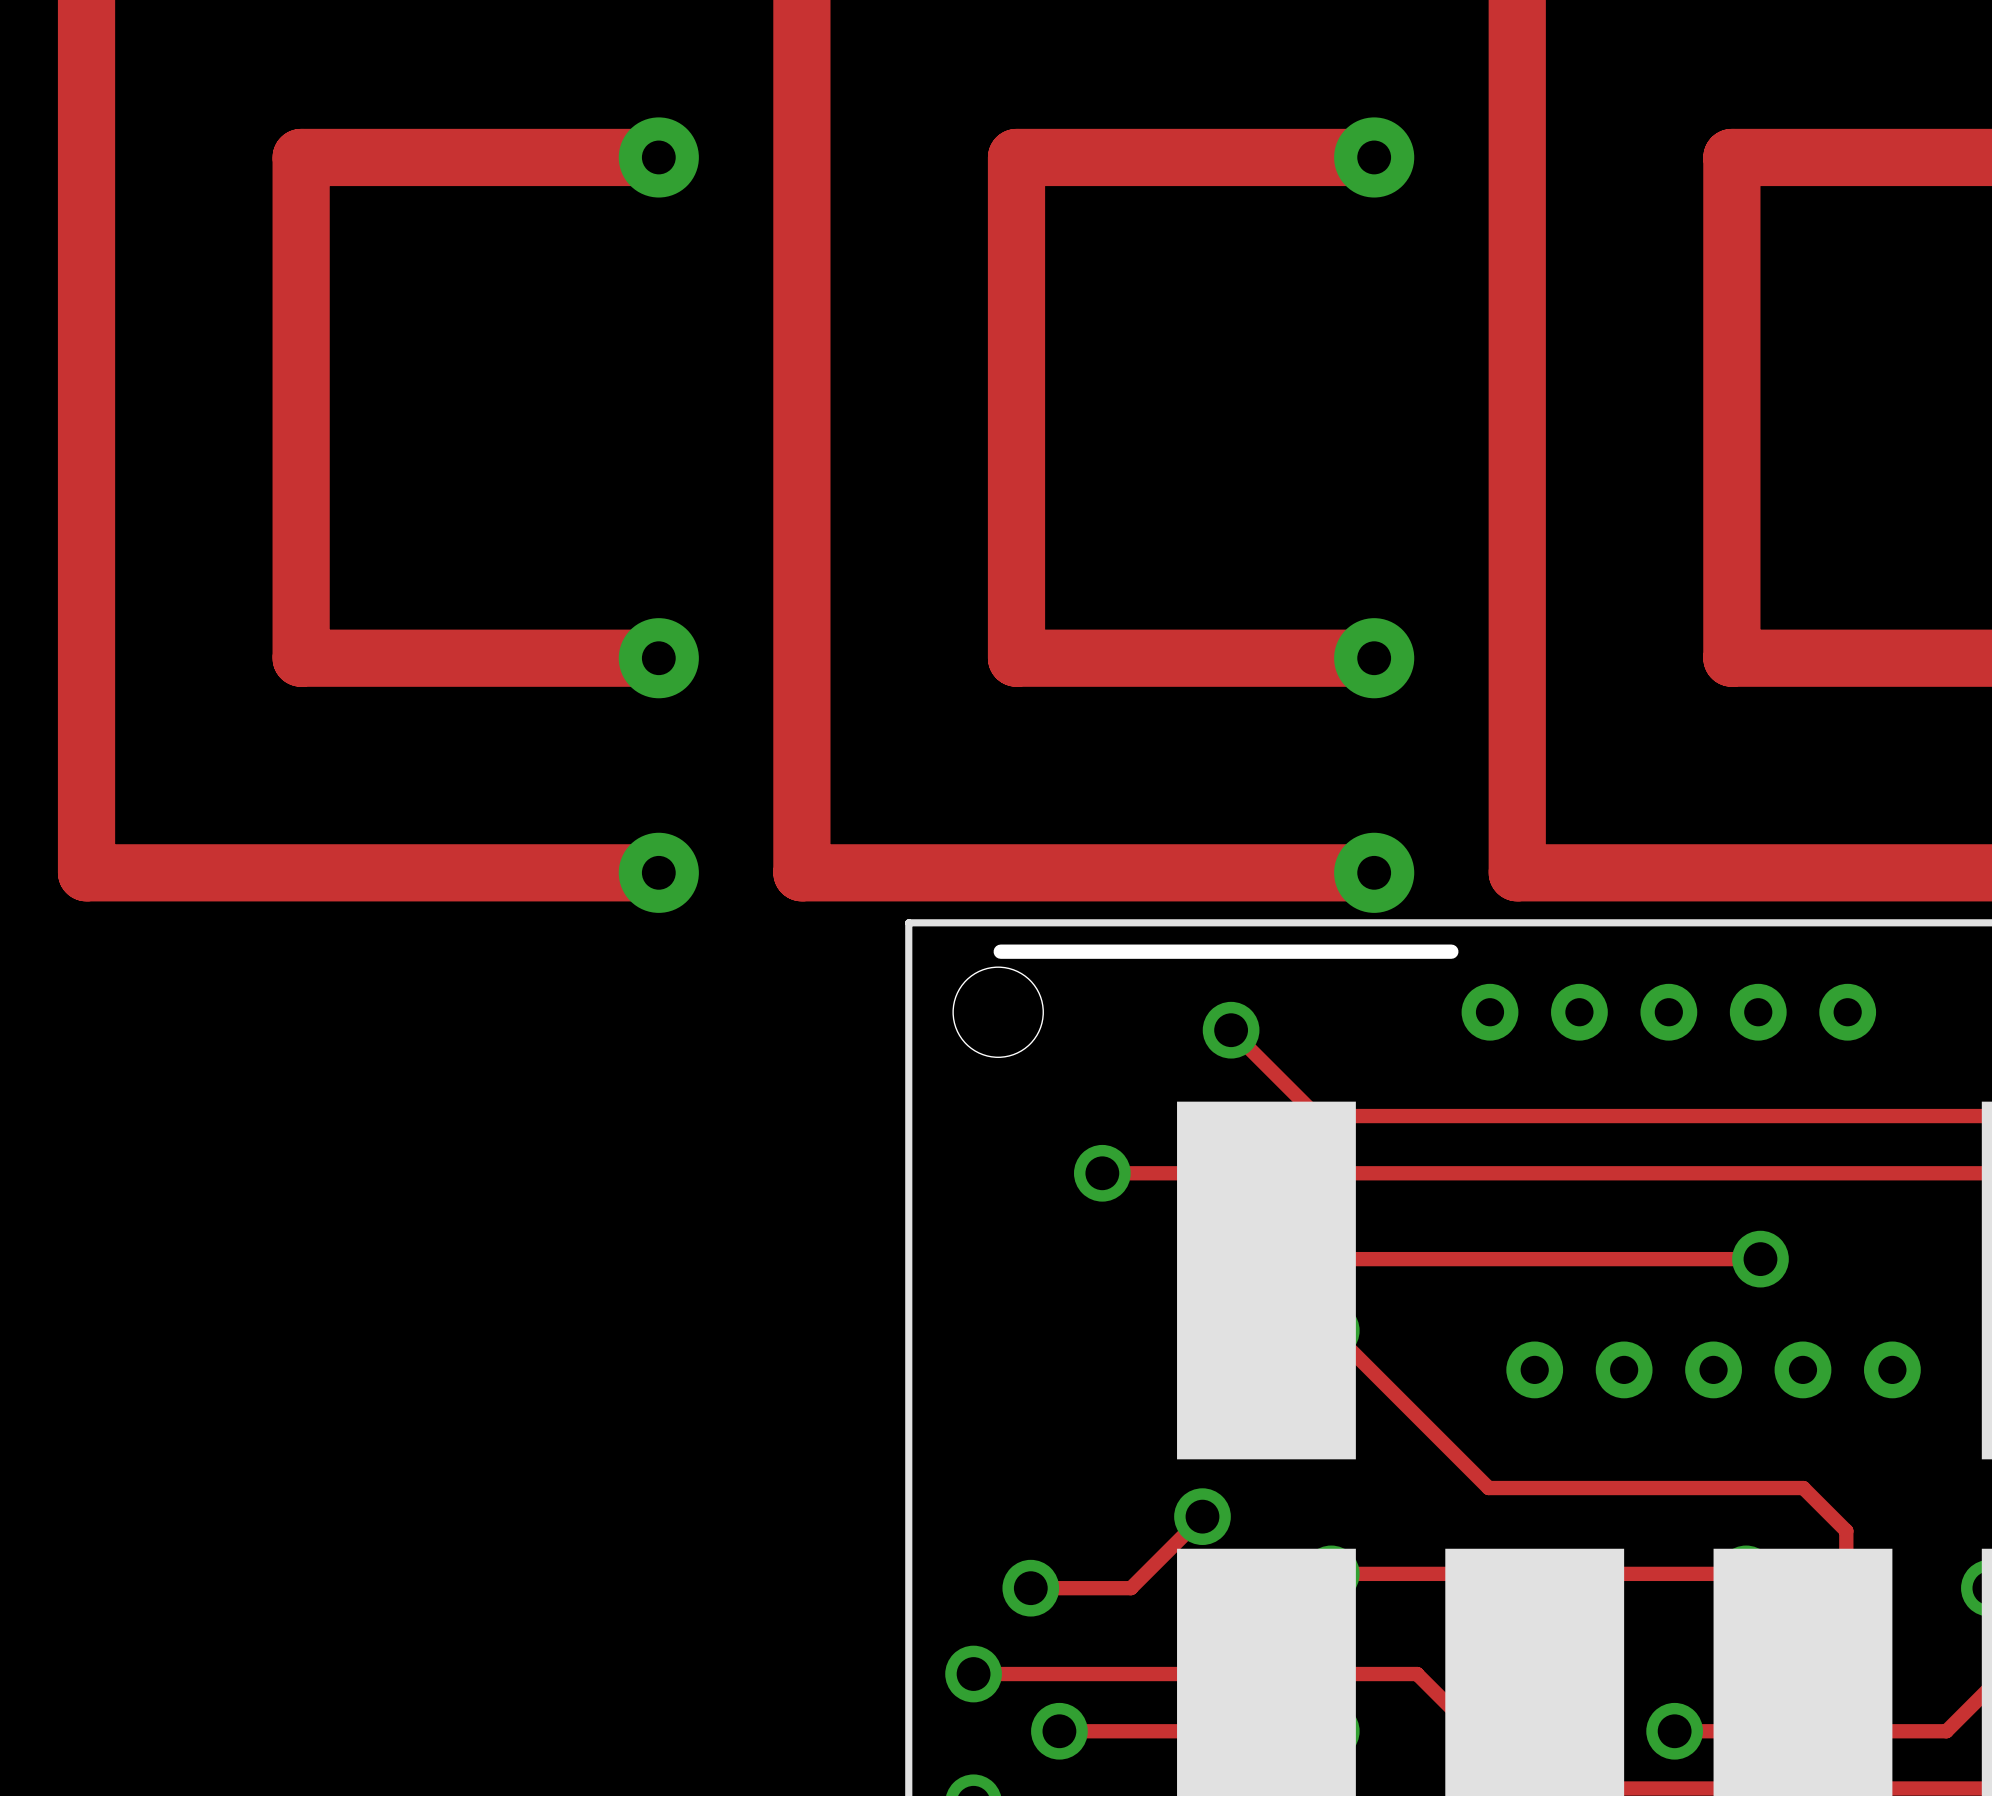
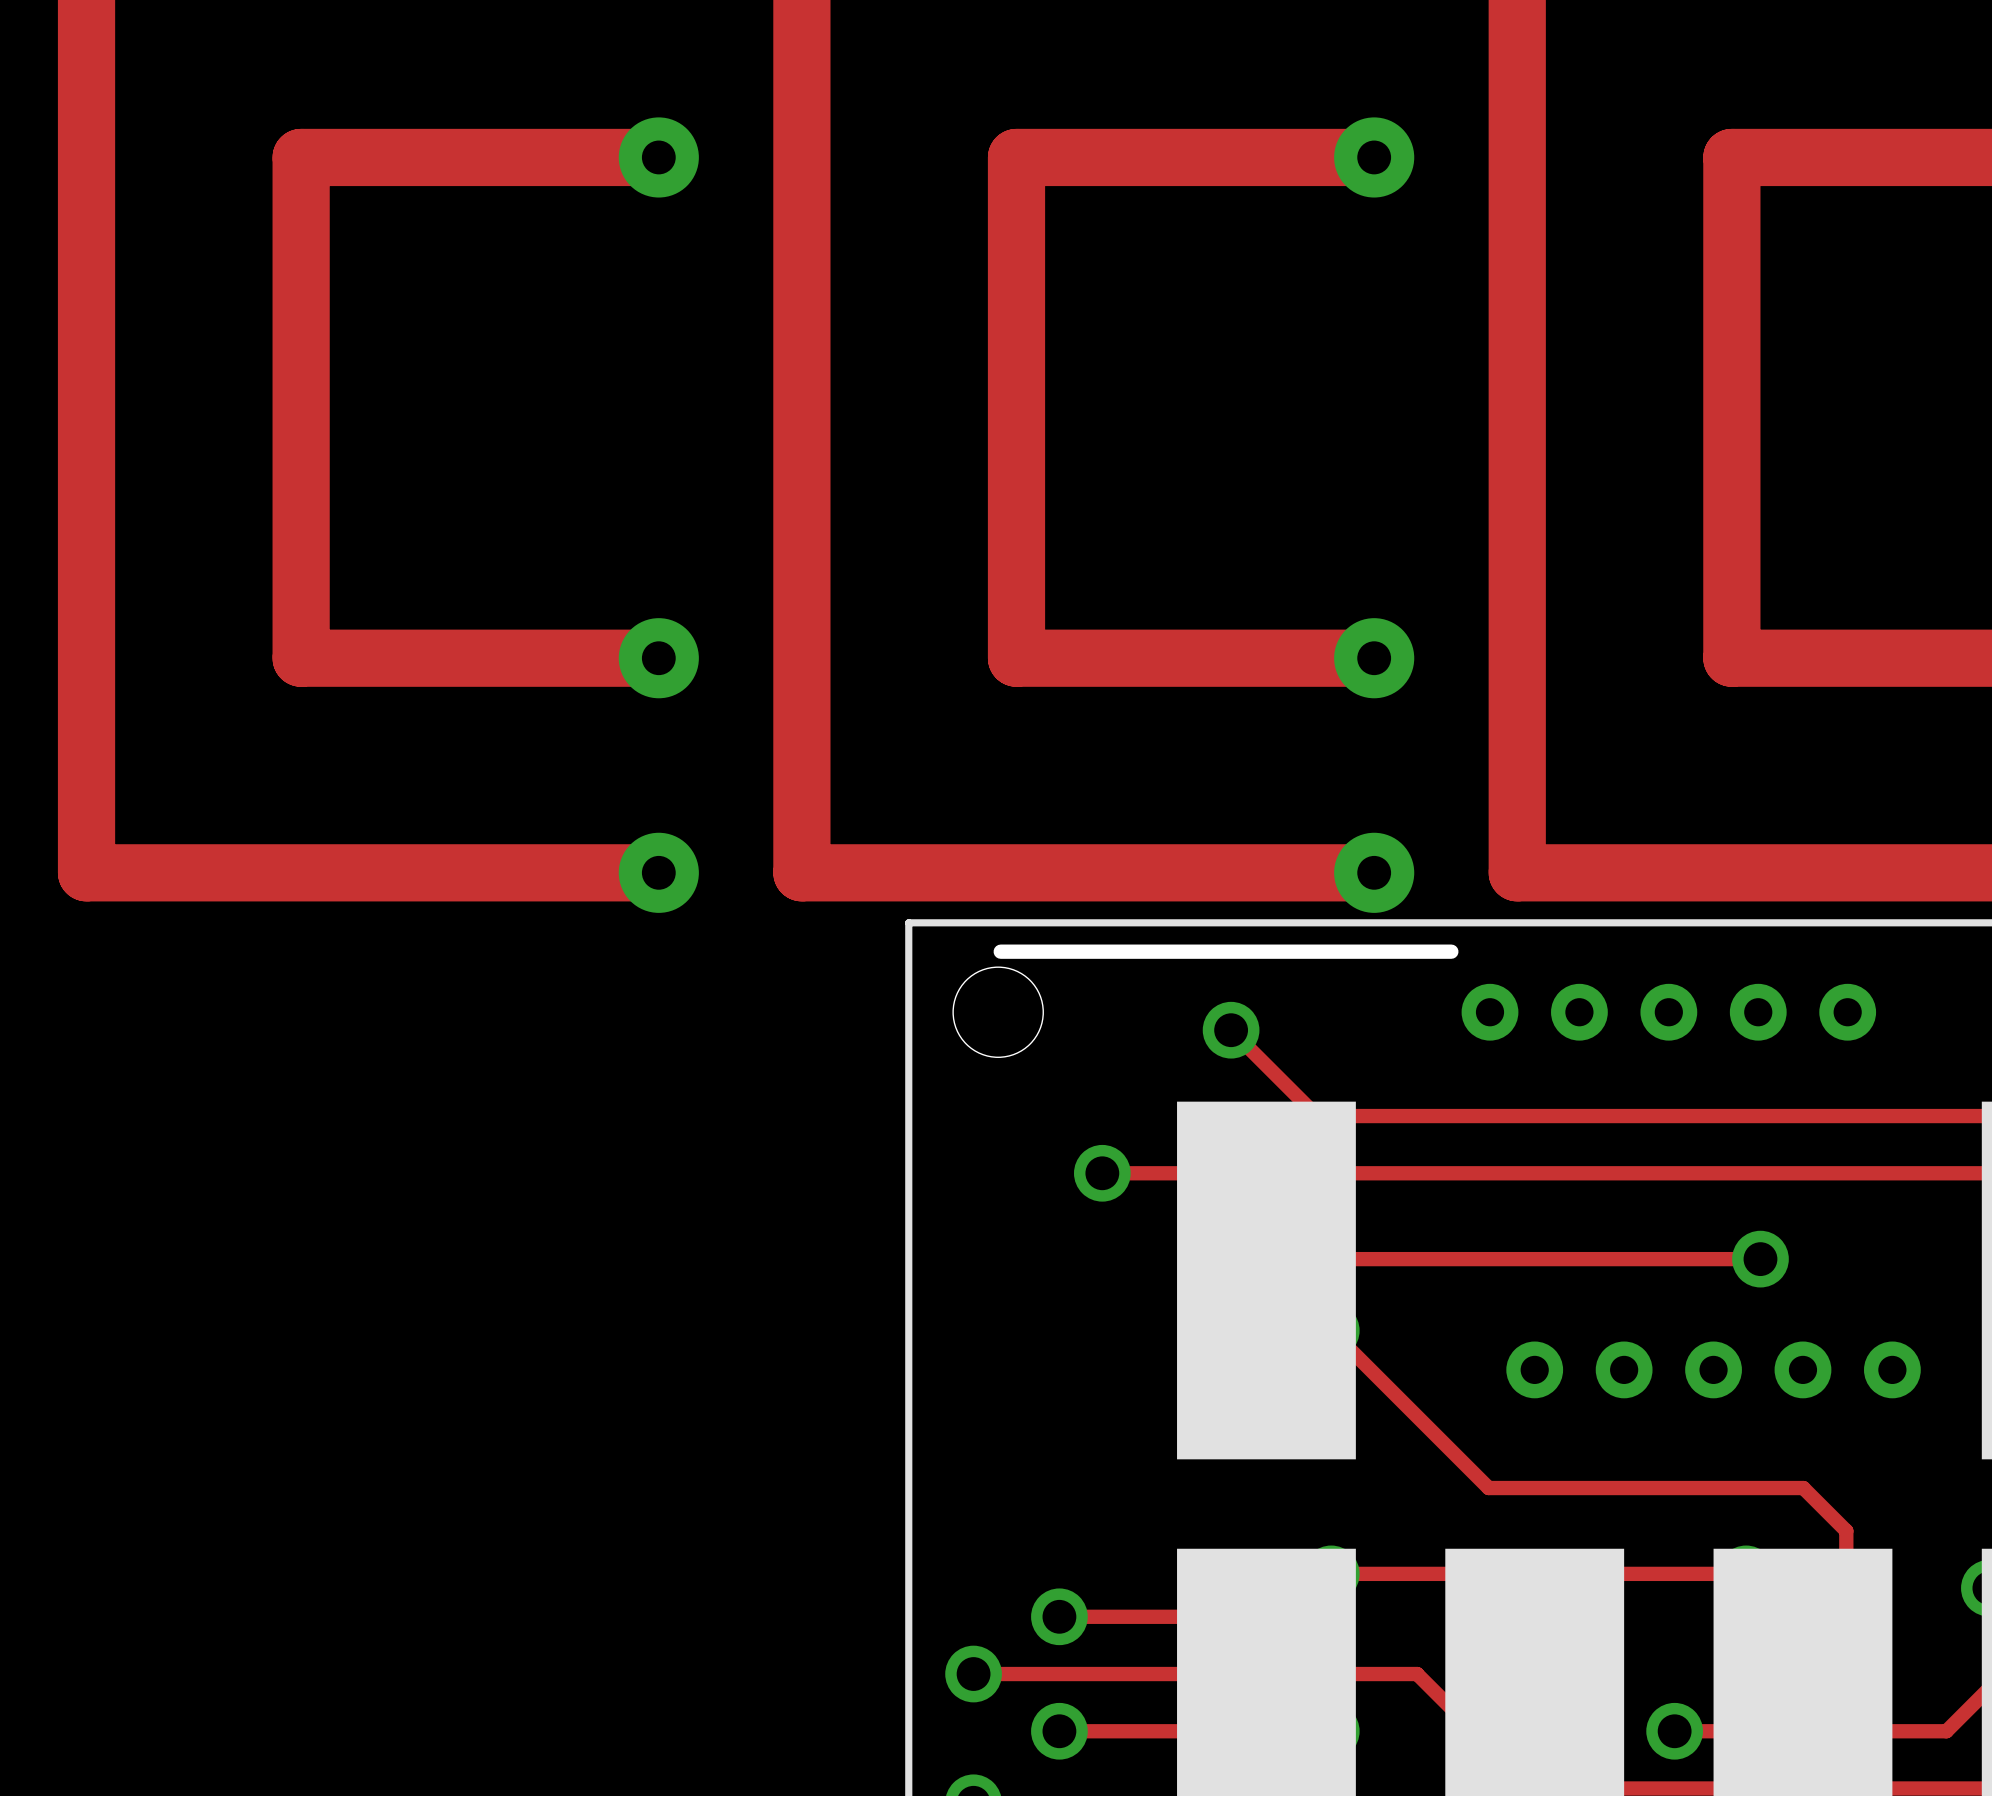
track: (1202, 1516) (1130, 1588) (1030, 1588) -> none
via: (1202, 1516) -> none
via position: (1030, 1588) -> (1059, 1616)
track: none -> (1059, 1616) (1231, 1616)

